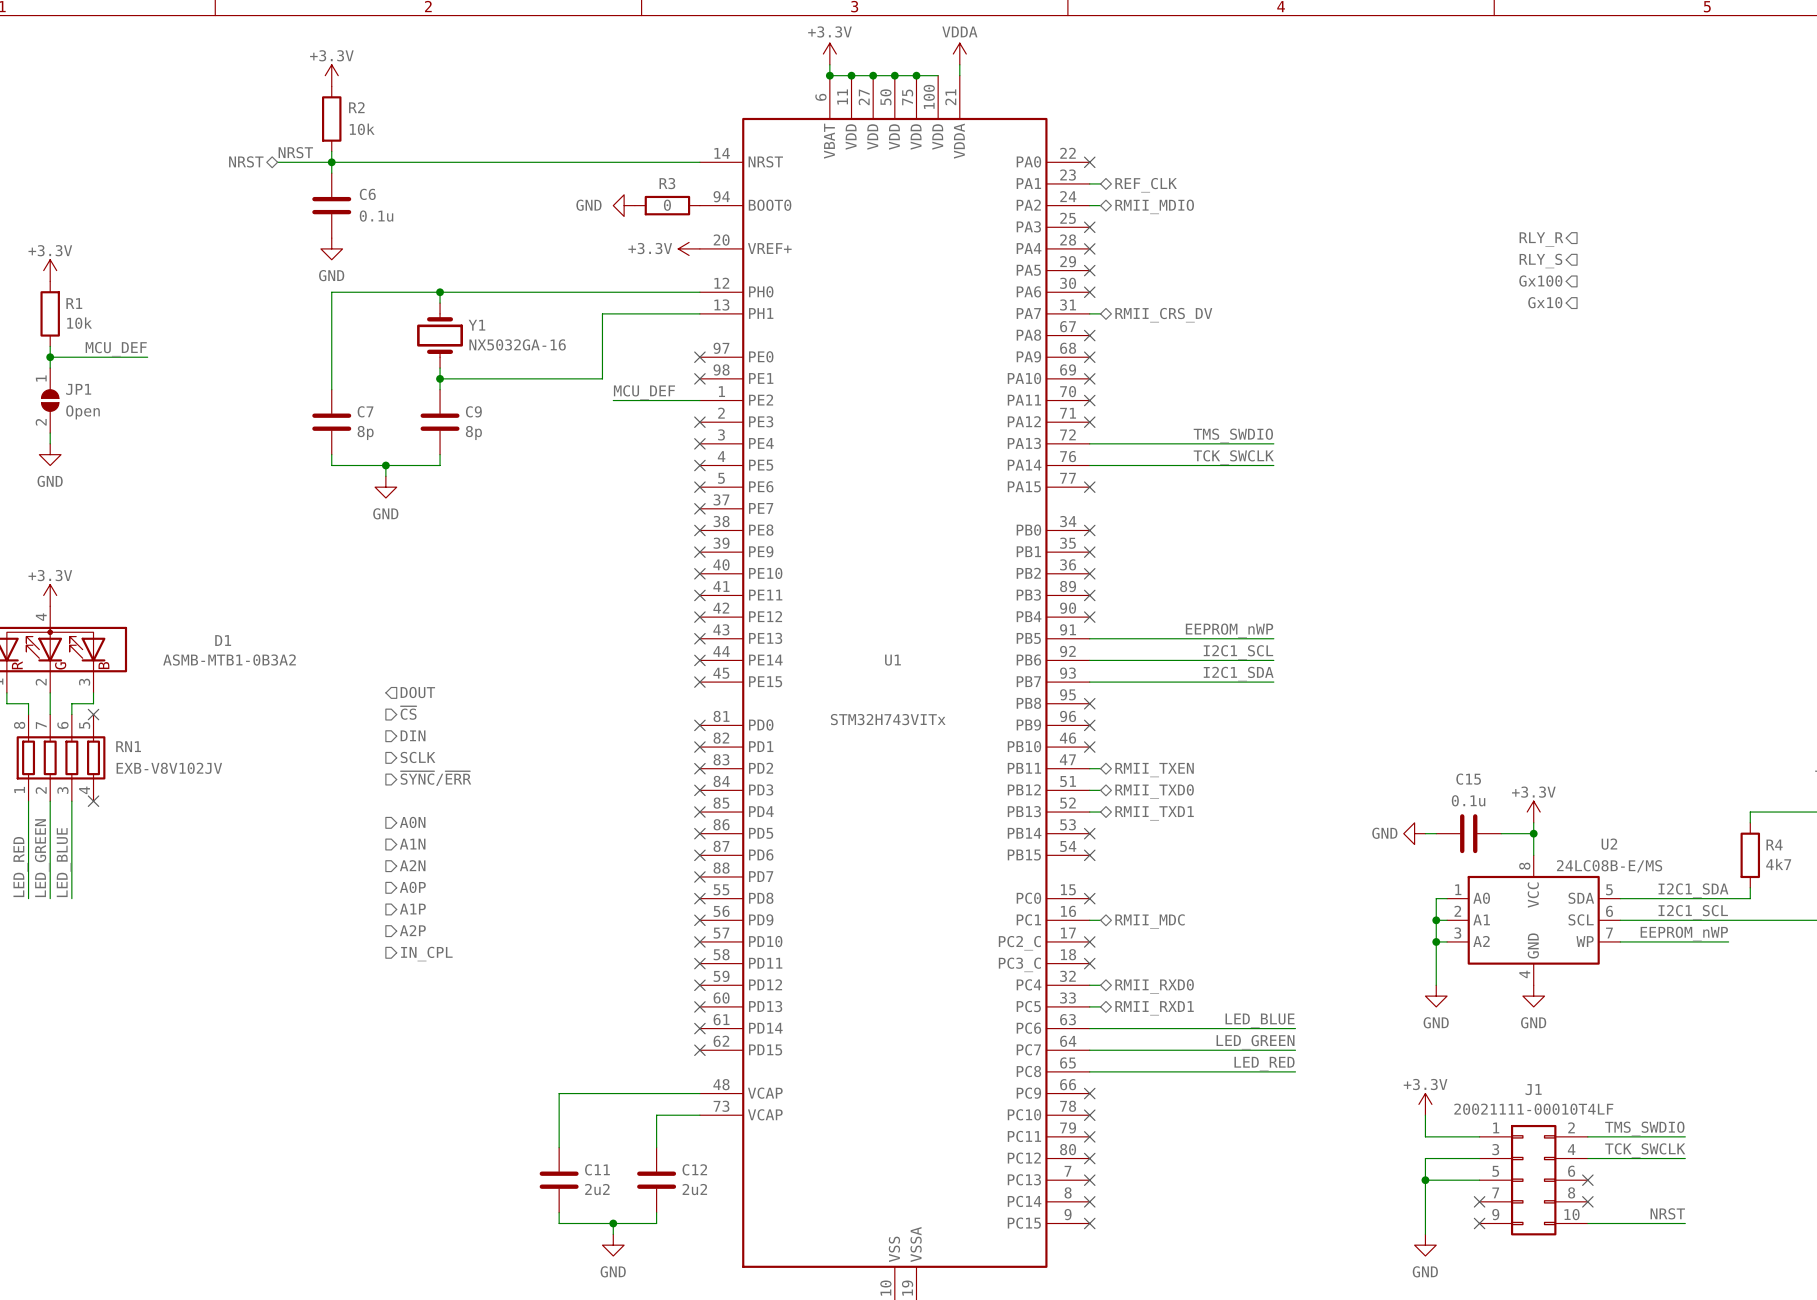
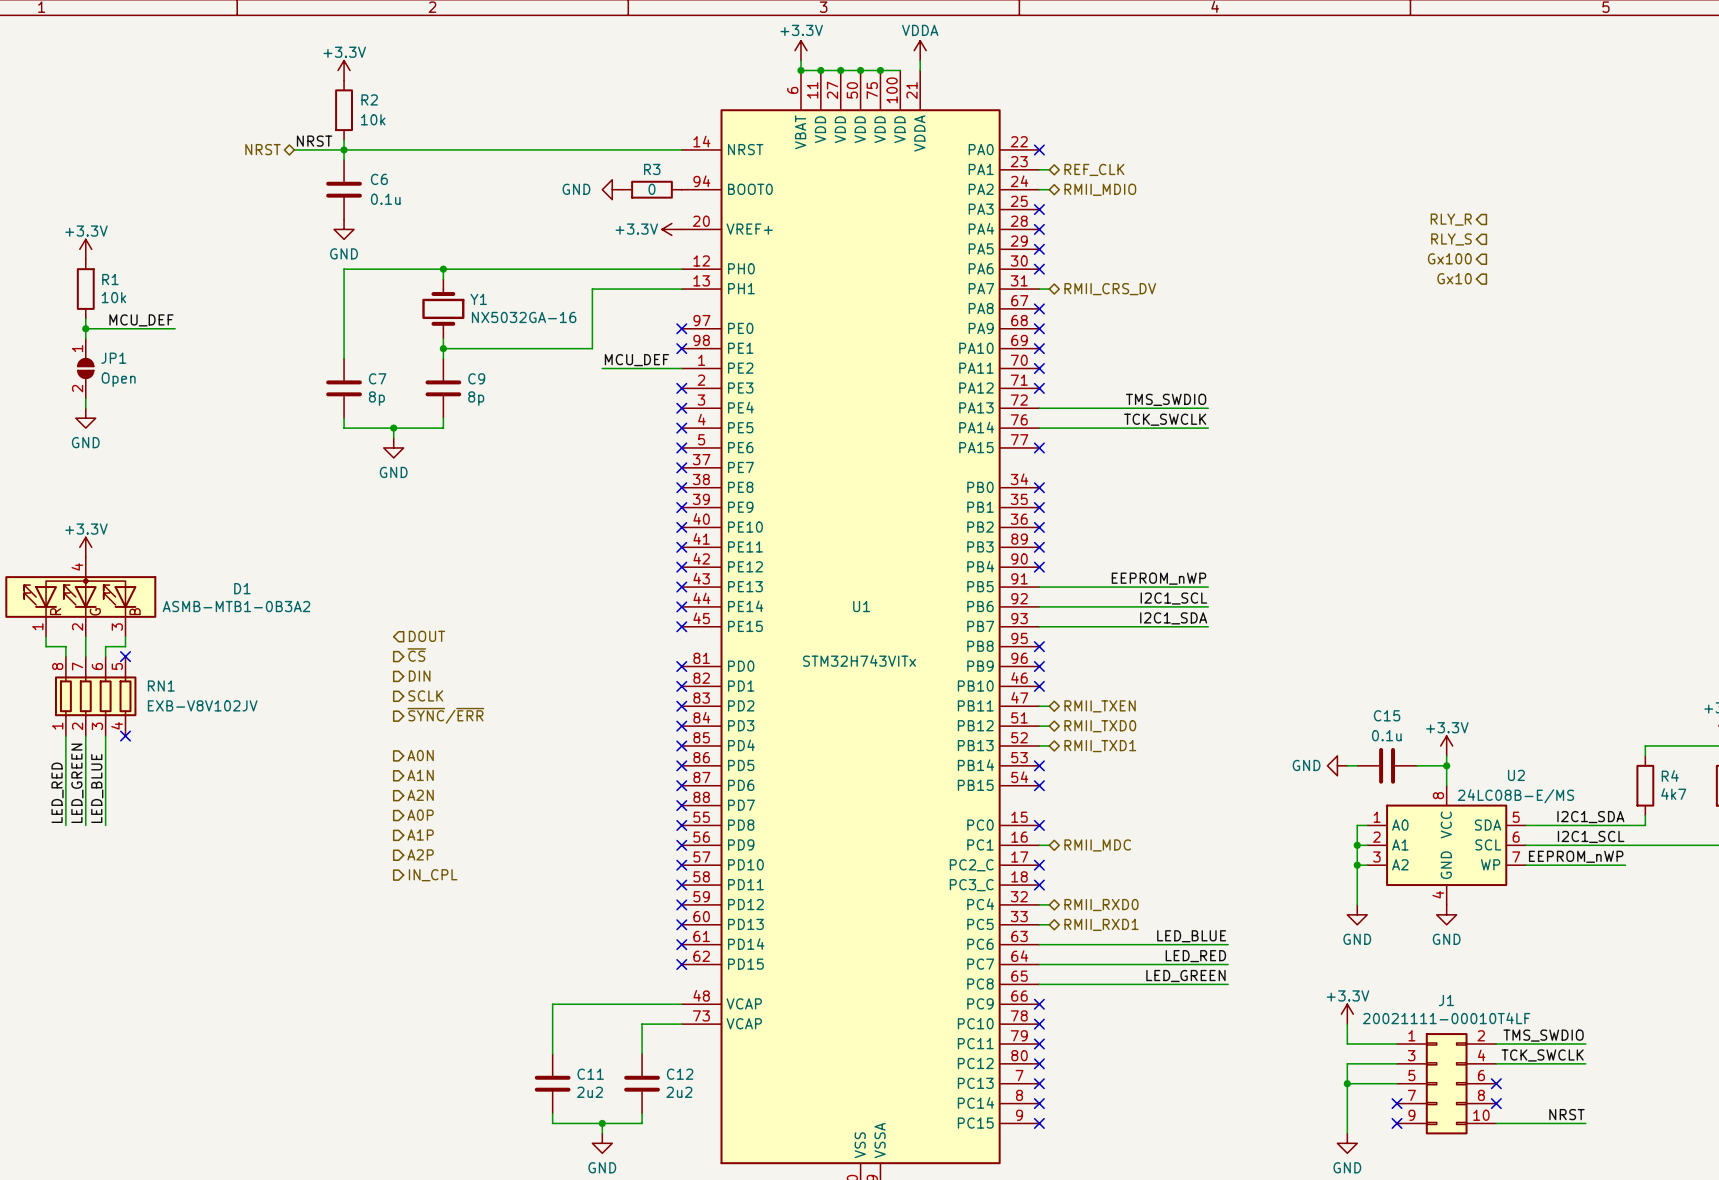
label: LED_GREEN (1255, 1042) -> LED_RED (1195, 956)
label: LED_RED (1264, 1063) -> LED_GREEN (1185, 975)

